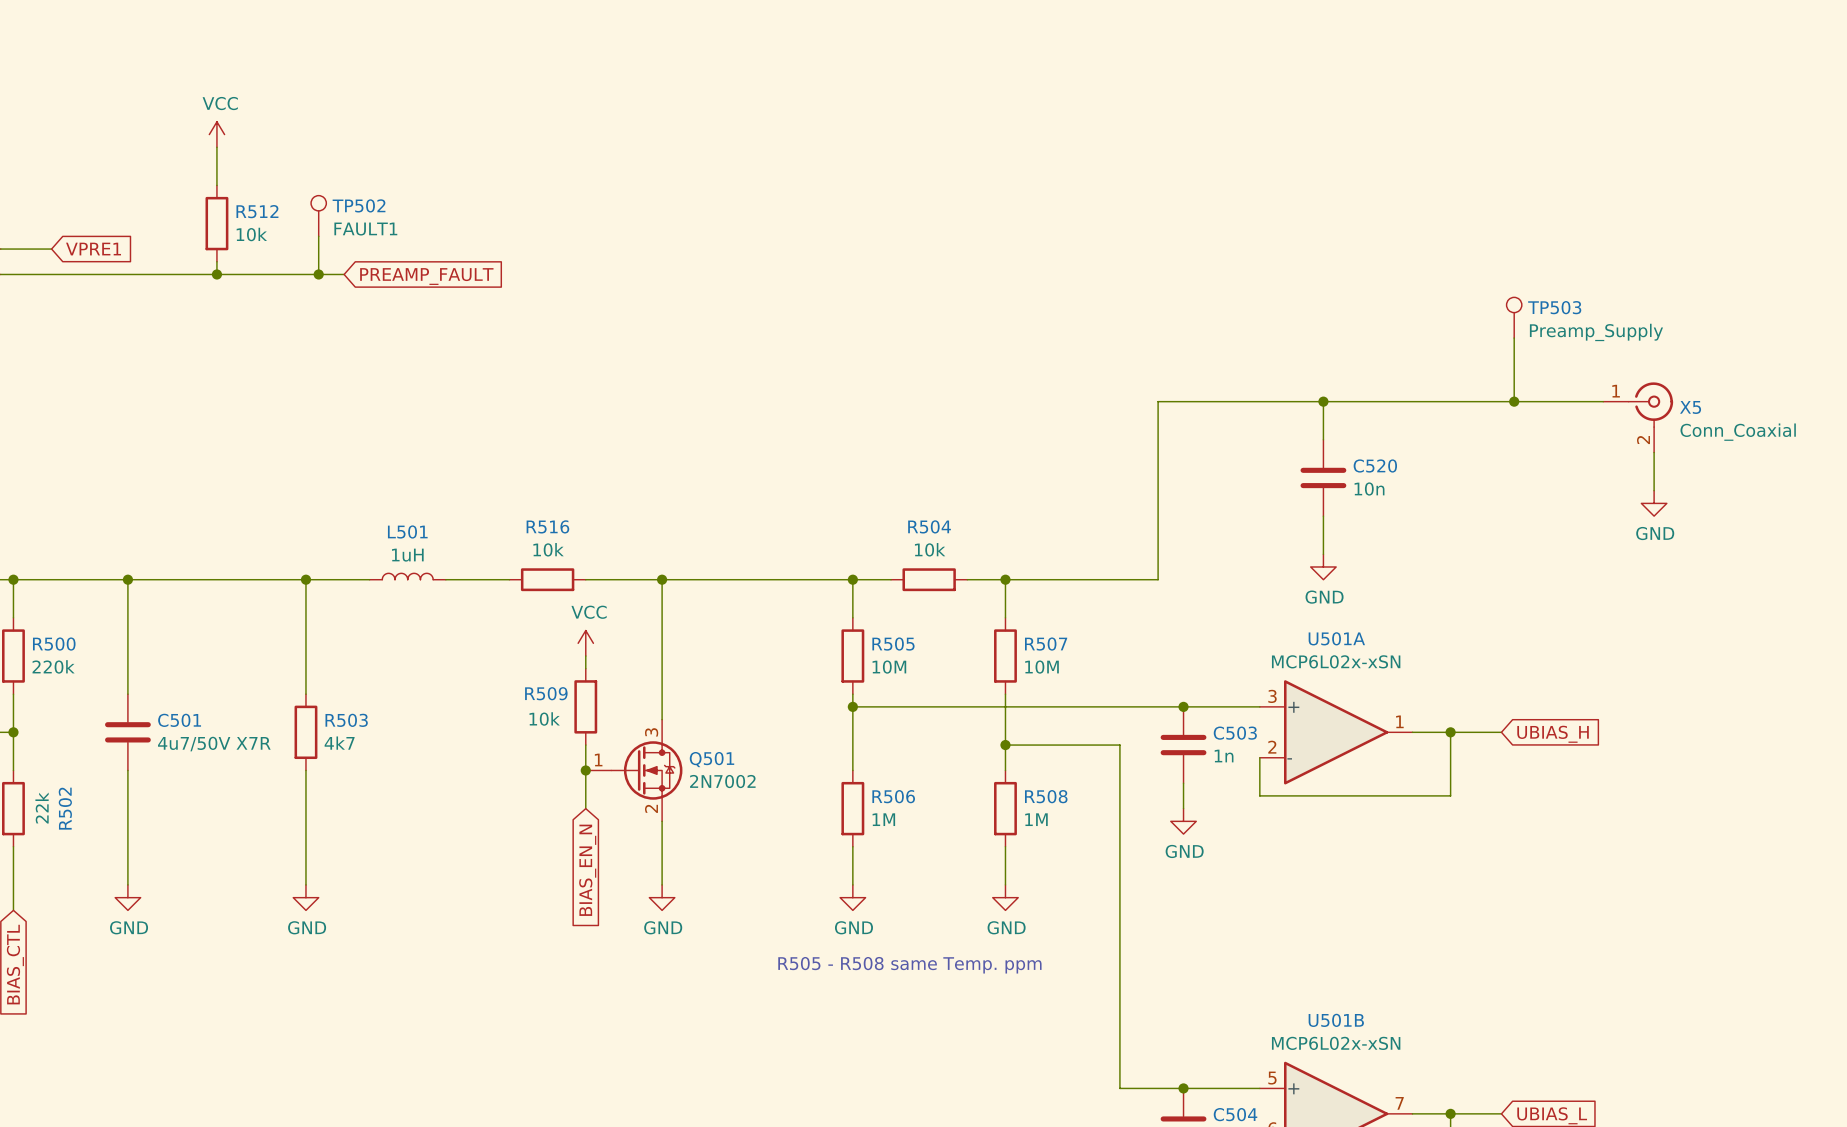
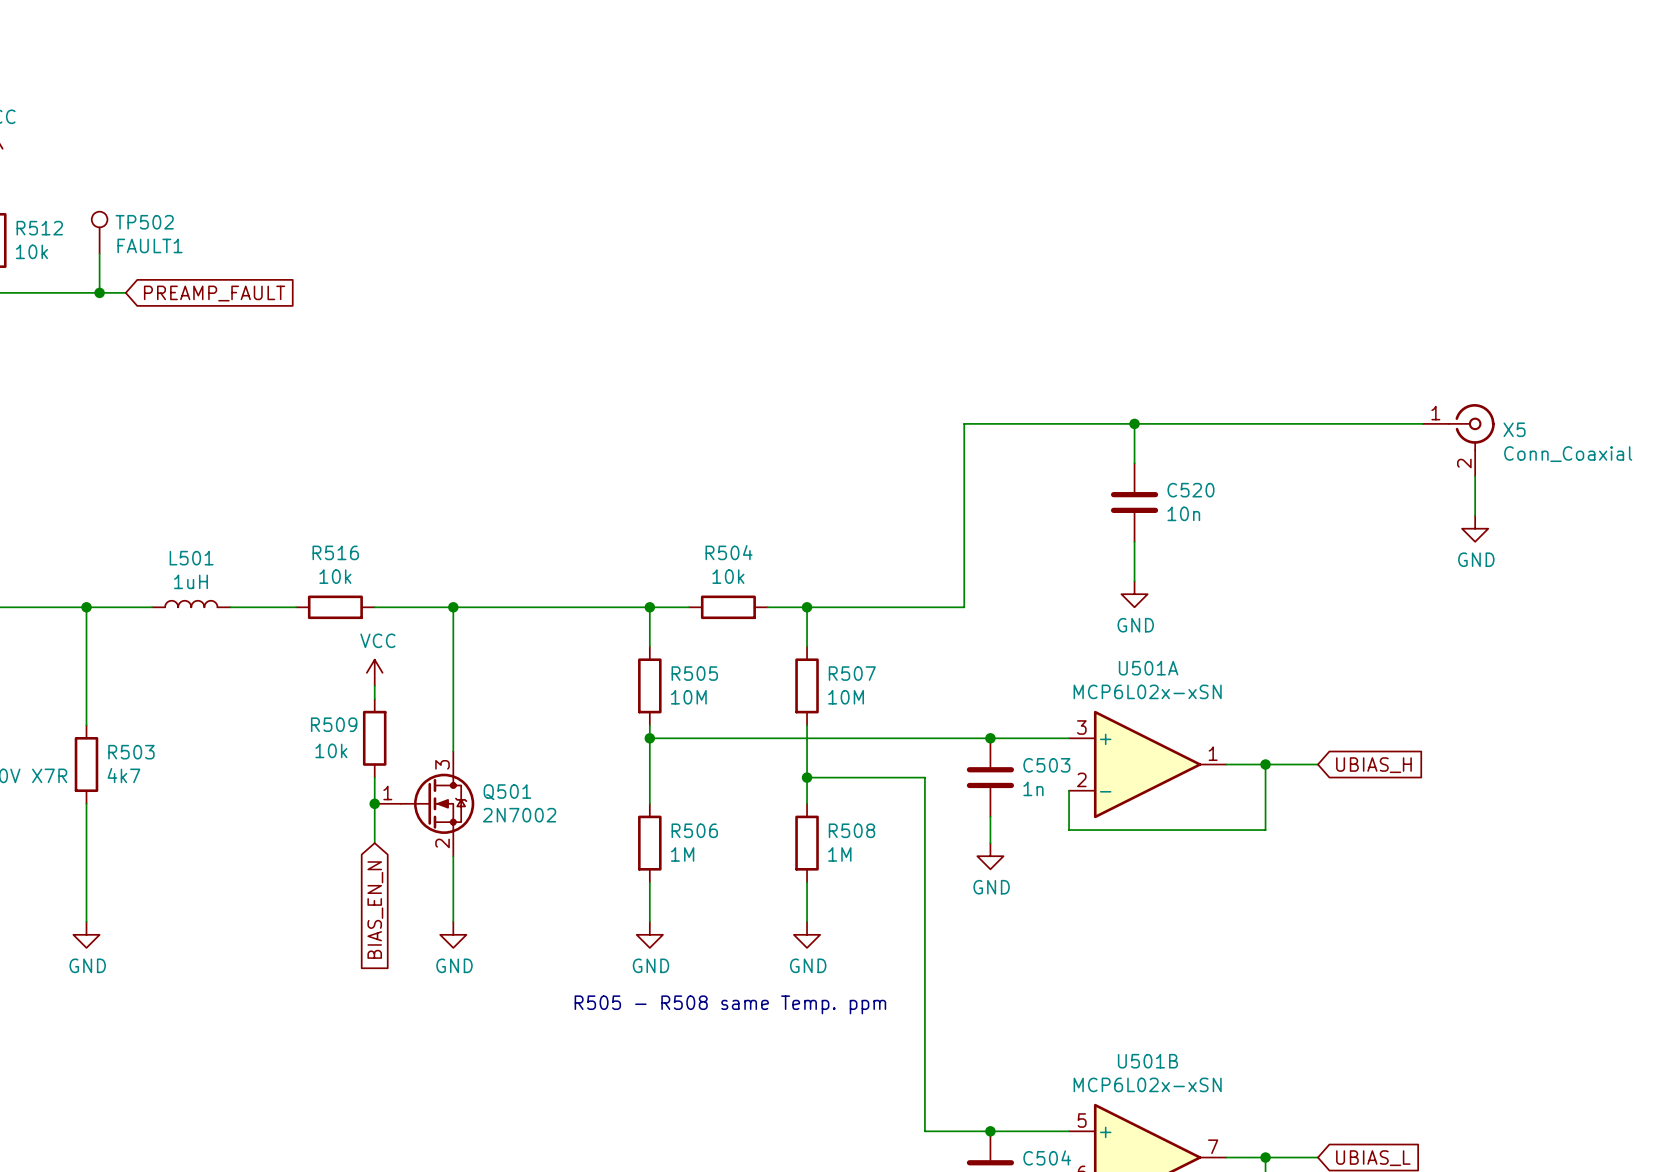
TP503: Preamp_Supply (1514, 317) -> none
wire: (1514, 338) (1514, 401) -> none
junction: (1514, 401) -> none

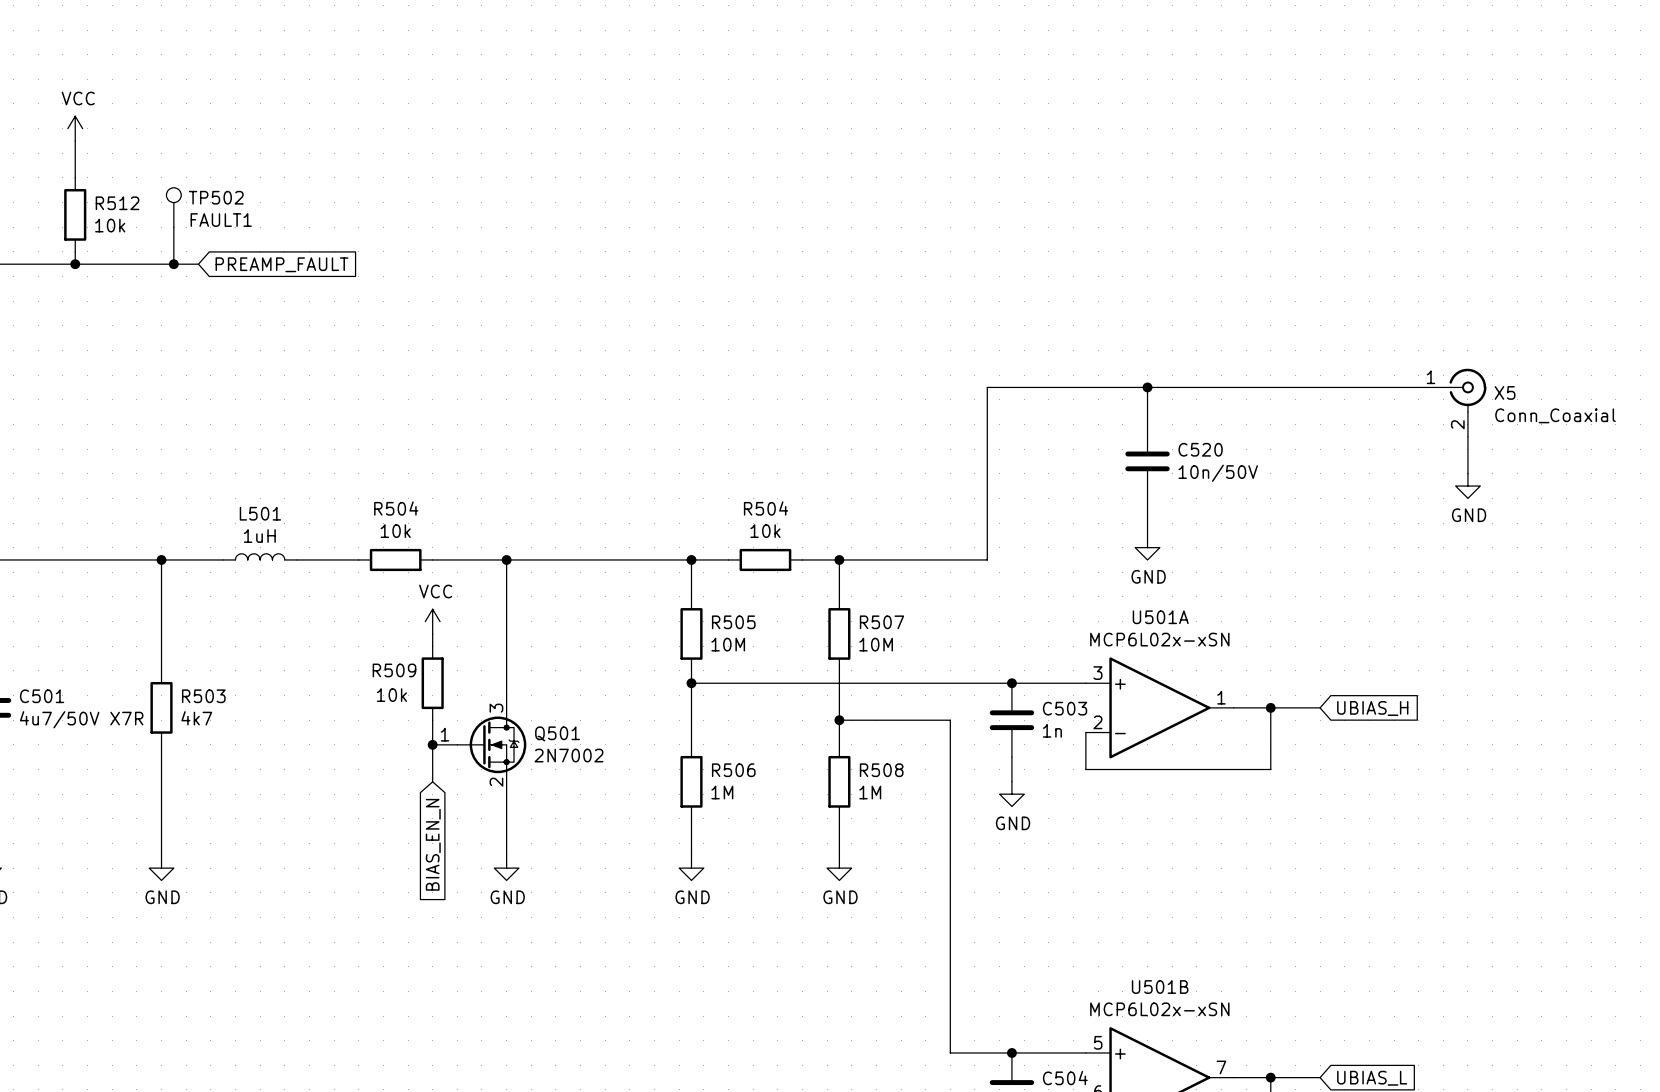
C520 value: 10n (1183, 513) -> 10n/50V (1218, 473)
R516 name: R516 (335, 552) -> R504 (396, 508)
text: R505 - R508 same Temp. ppm (730, 1004) -> none

